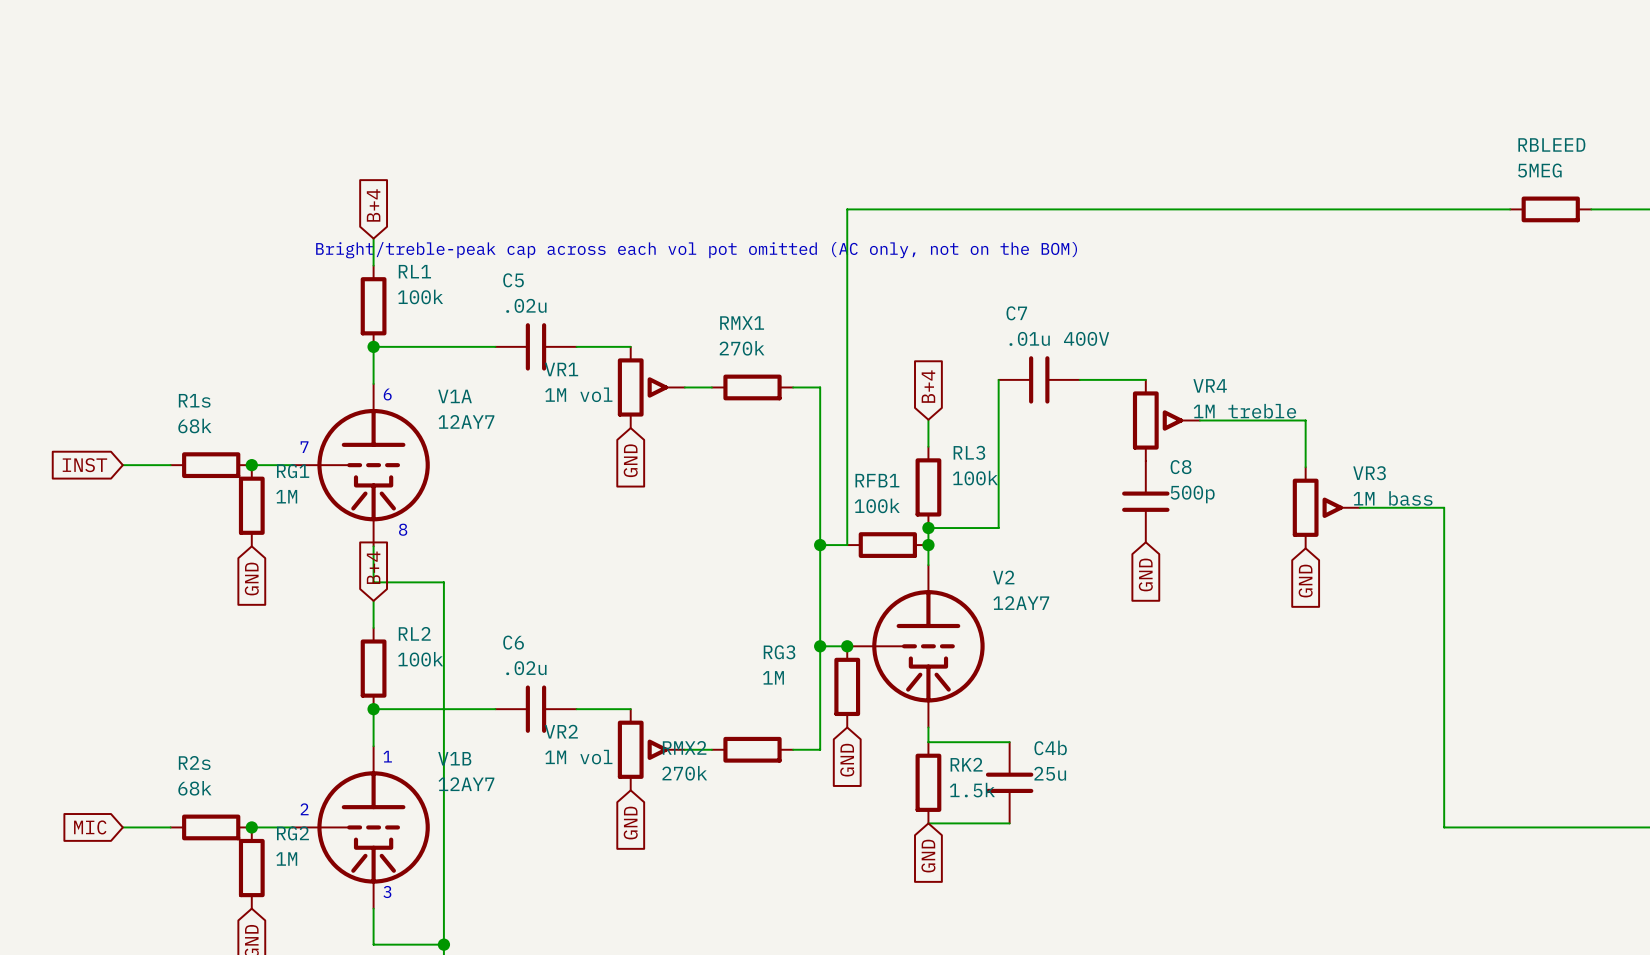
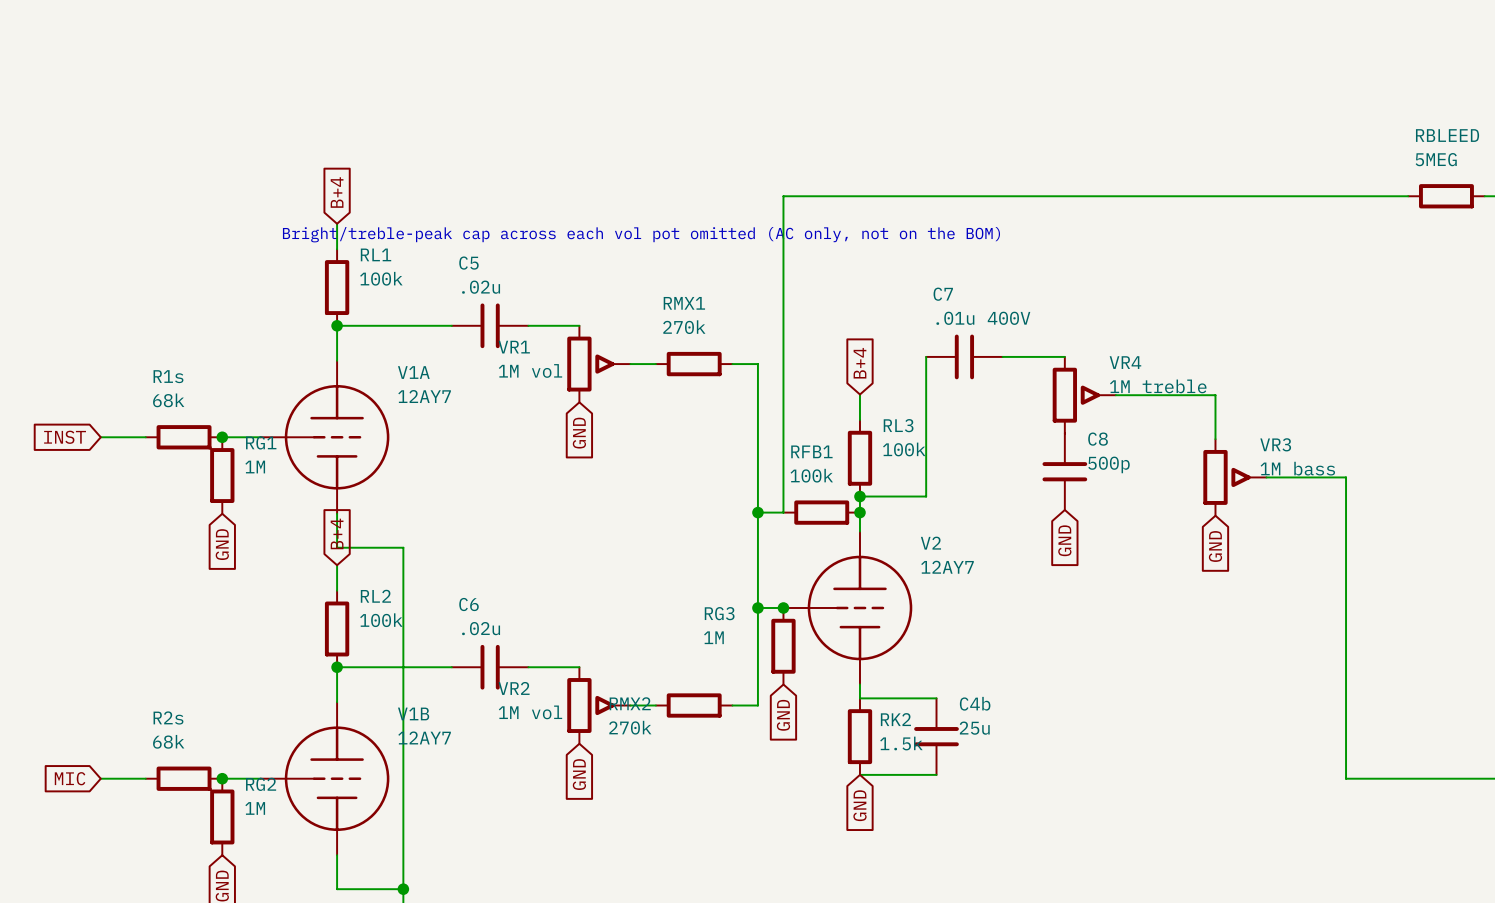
V1A symbol: [292, 383, 430, 547] -> [260, 360, 390, 514]
text: 6 (387, 394) -> none
text: 7 (304, 447) -> none
text: 8 (403, 529) -> none
V2 symbol: [847, 565, 985, 728] -> [783, 531, 913, 685]
V1B symbol: [292, 746, 430, 909] -> [260, 702, 390, 856]
text: 1 (387, 756) -> none
text: 2 (304, 809) -> none
text: 3 (387, 892) -> none

